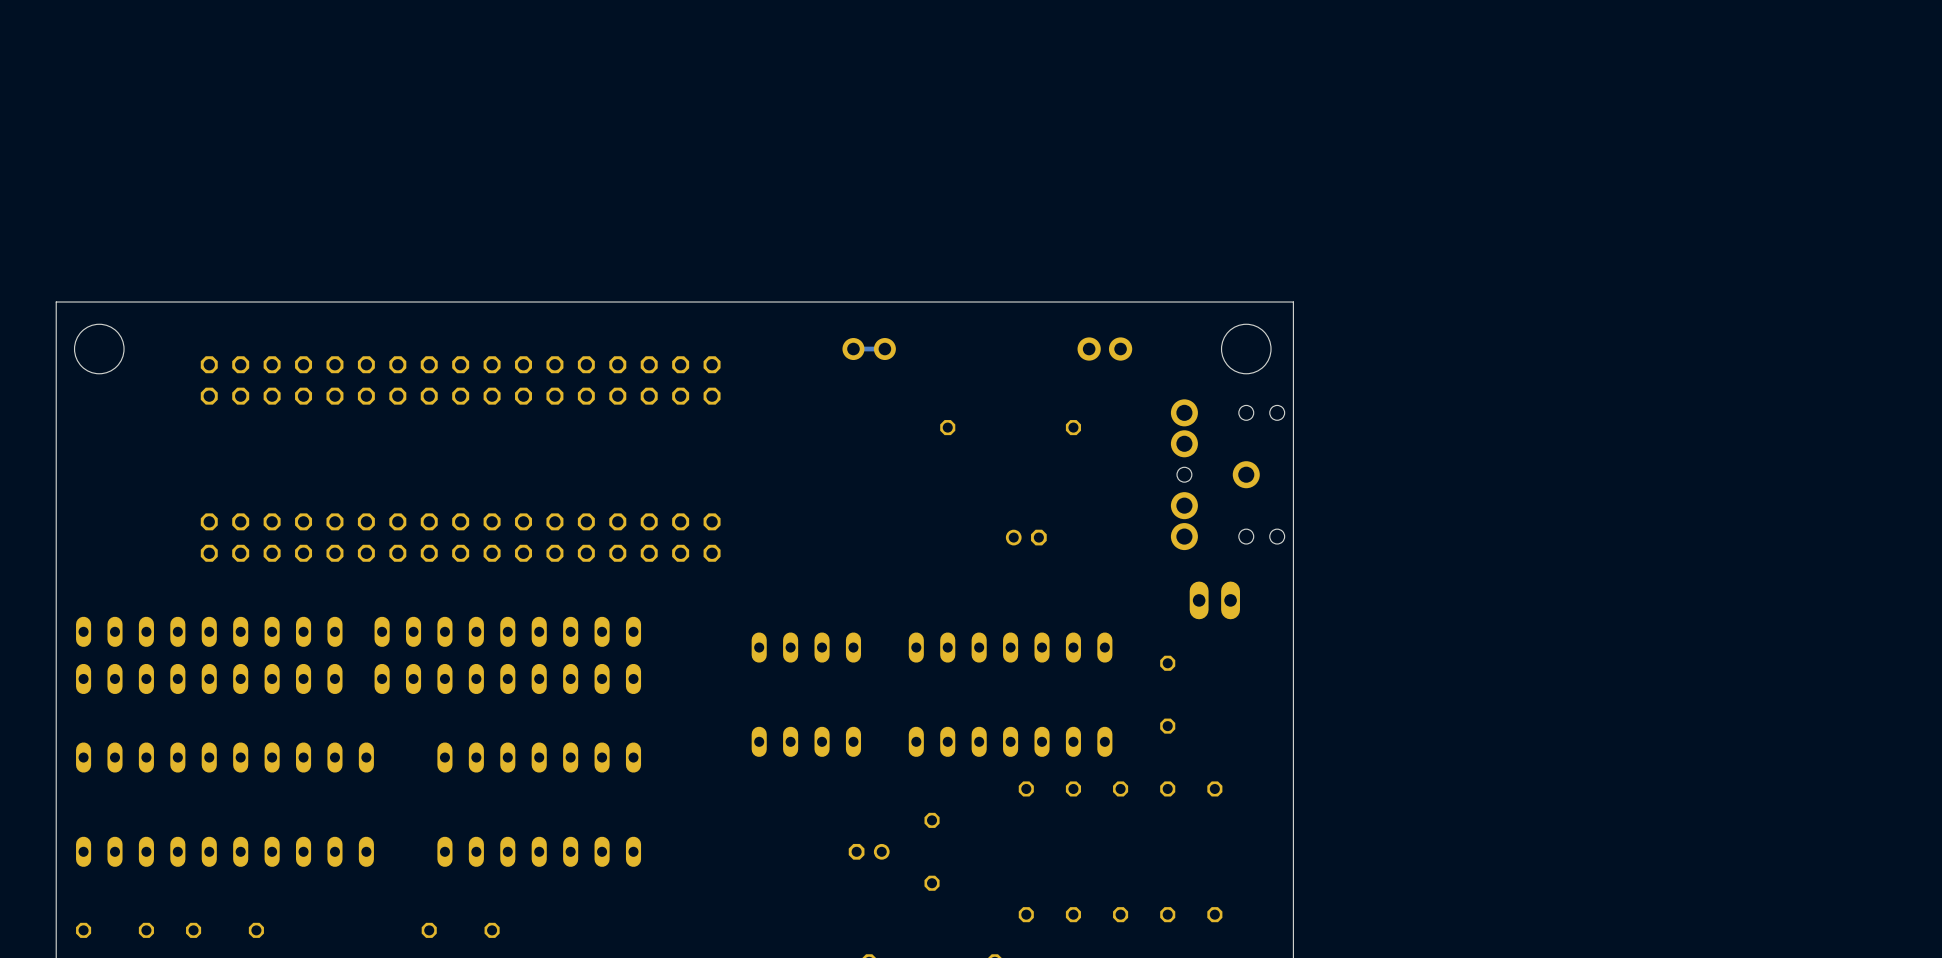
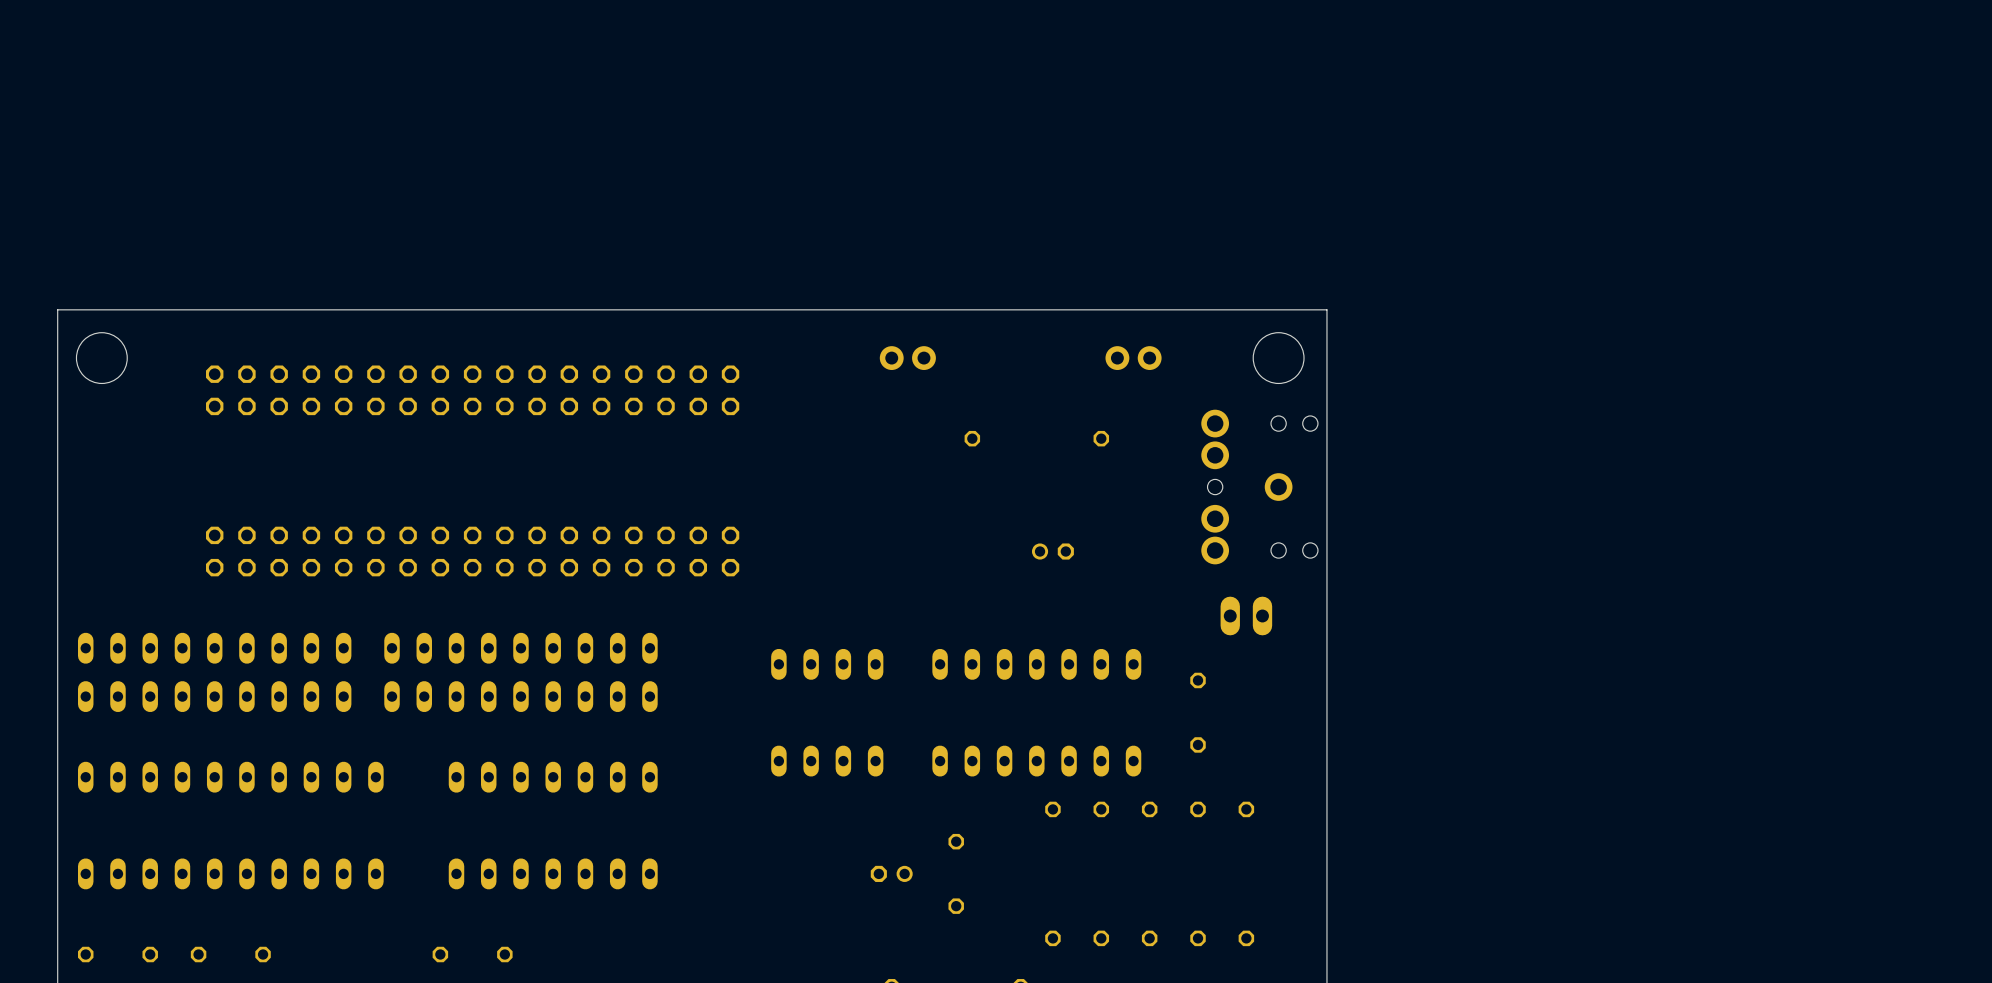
part: (869, 349) -> none
part: none -> (907, 358)

